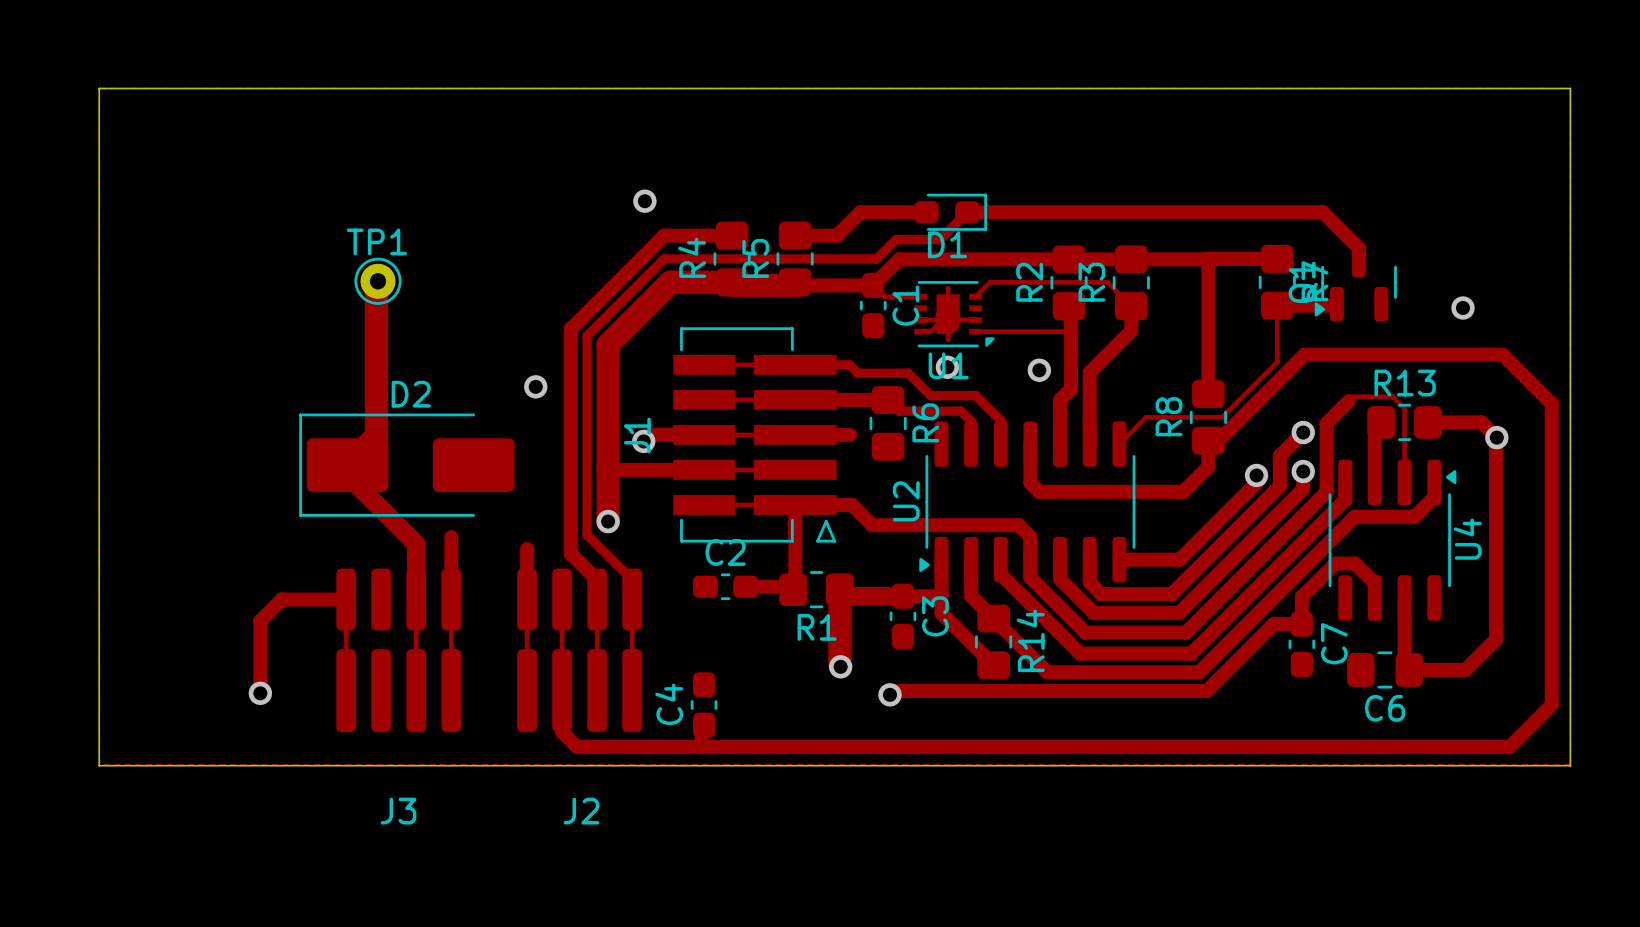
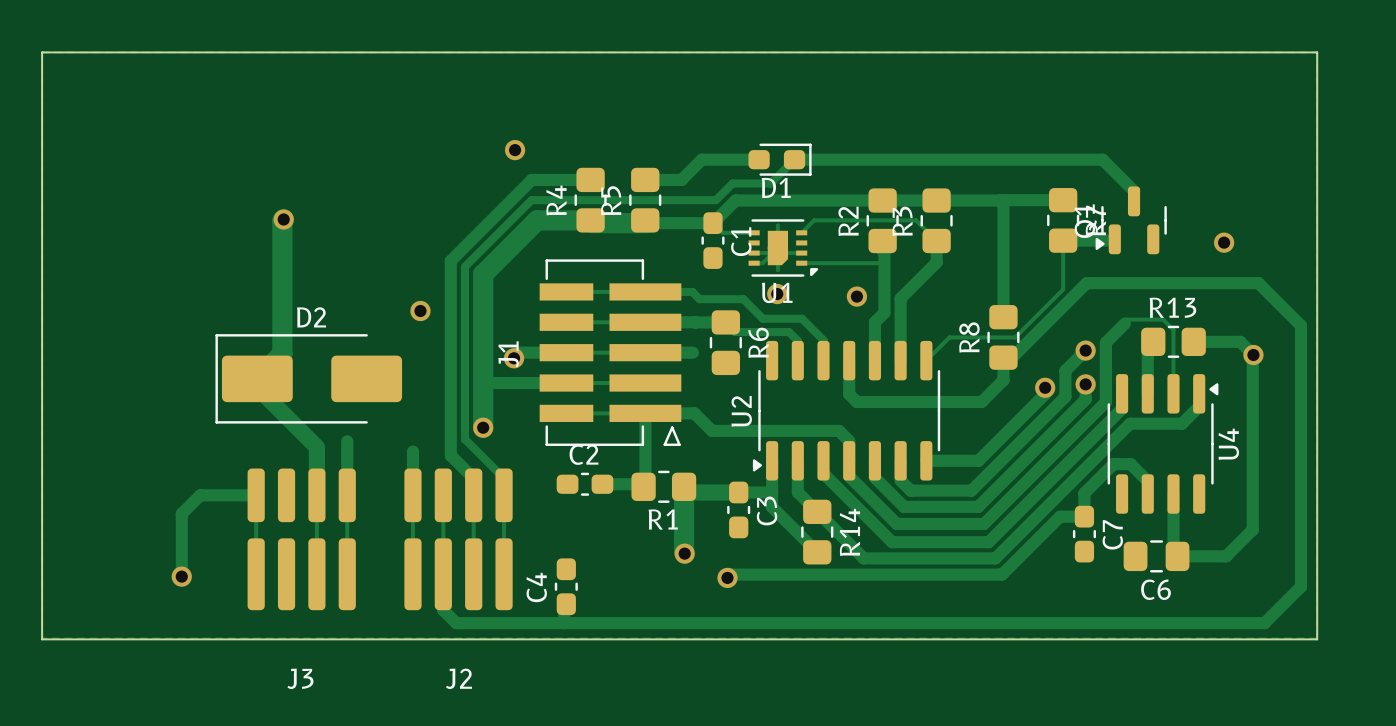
TP1: (378, 281) -> none
via: none -> (283, 219)

